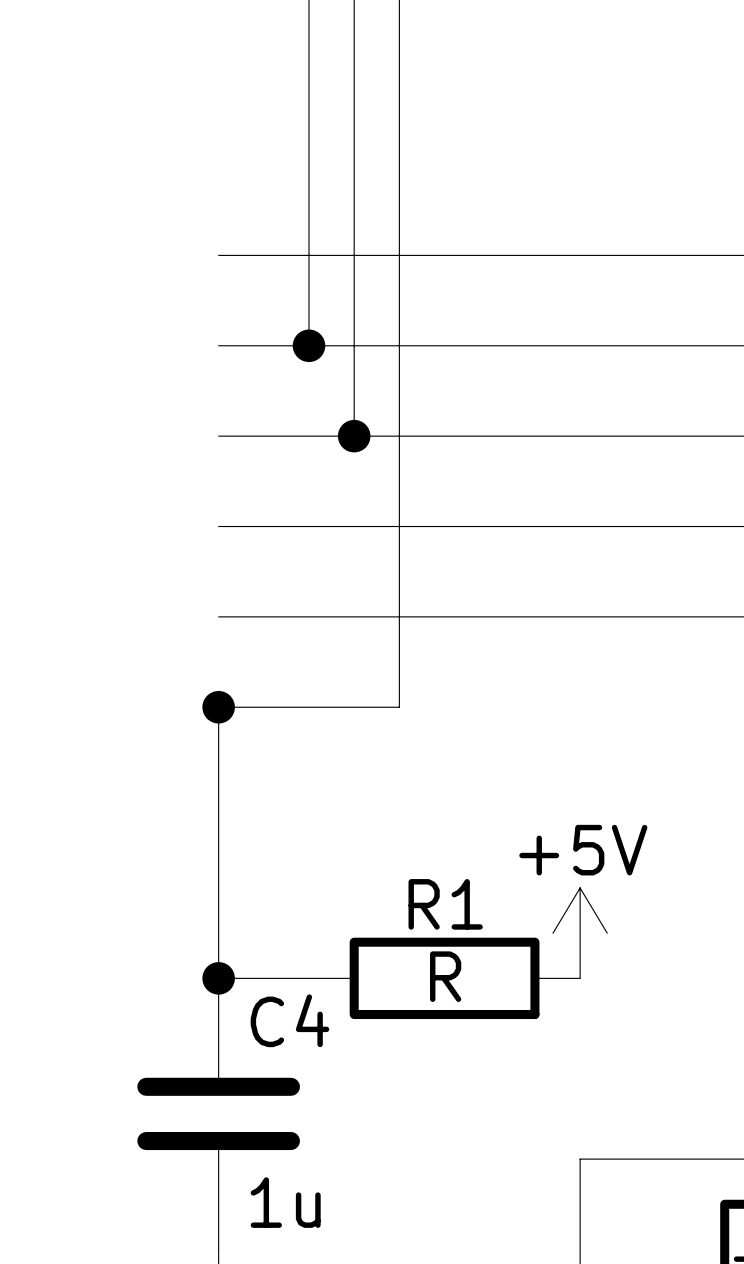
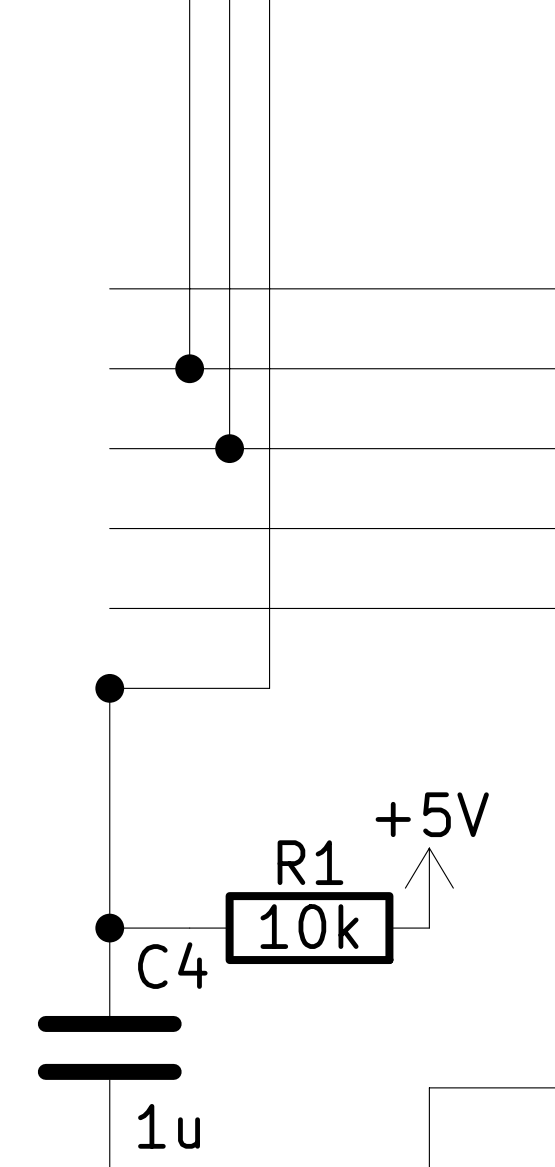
R1 value: R (445, 976) -> 10k (309, 926)

